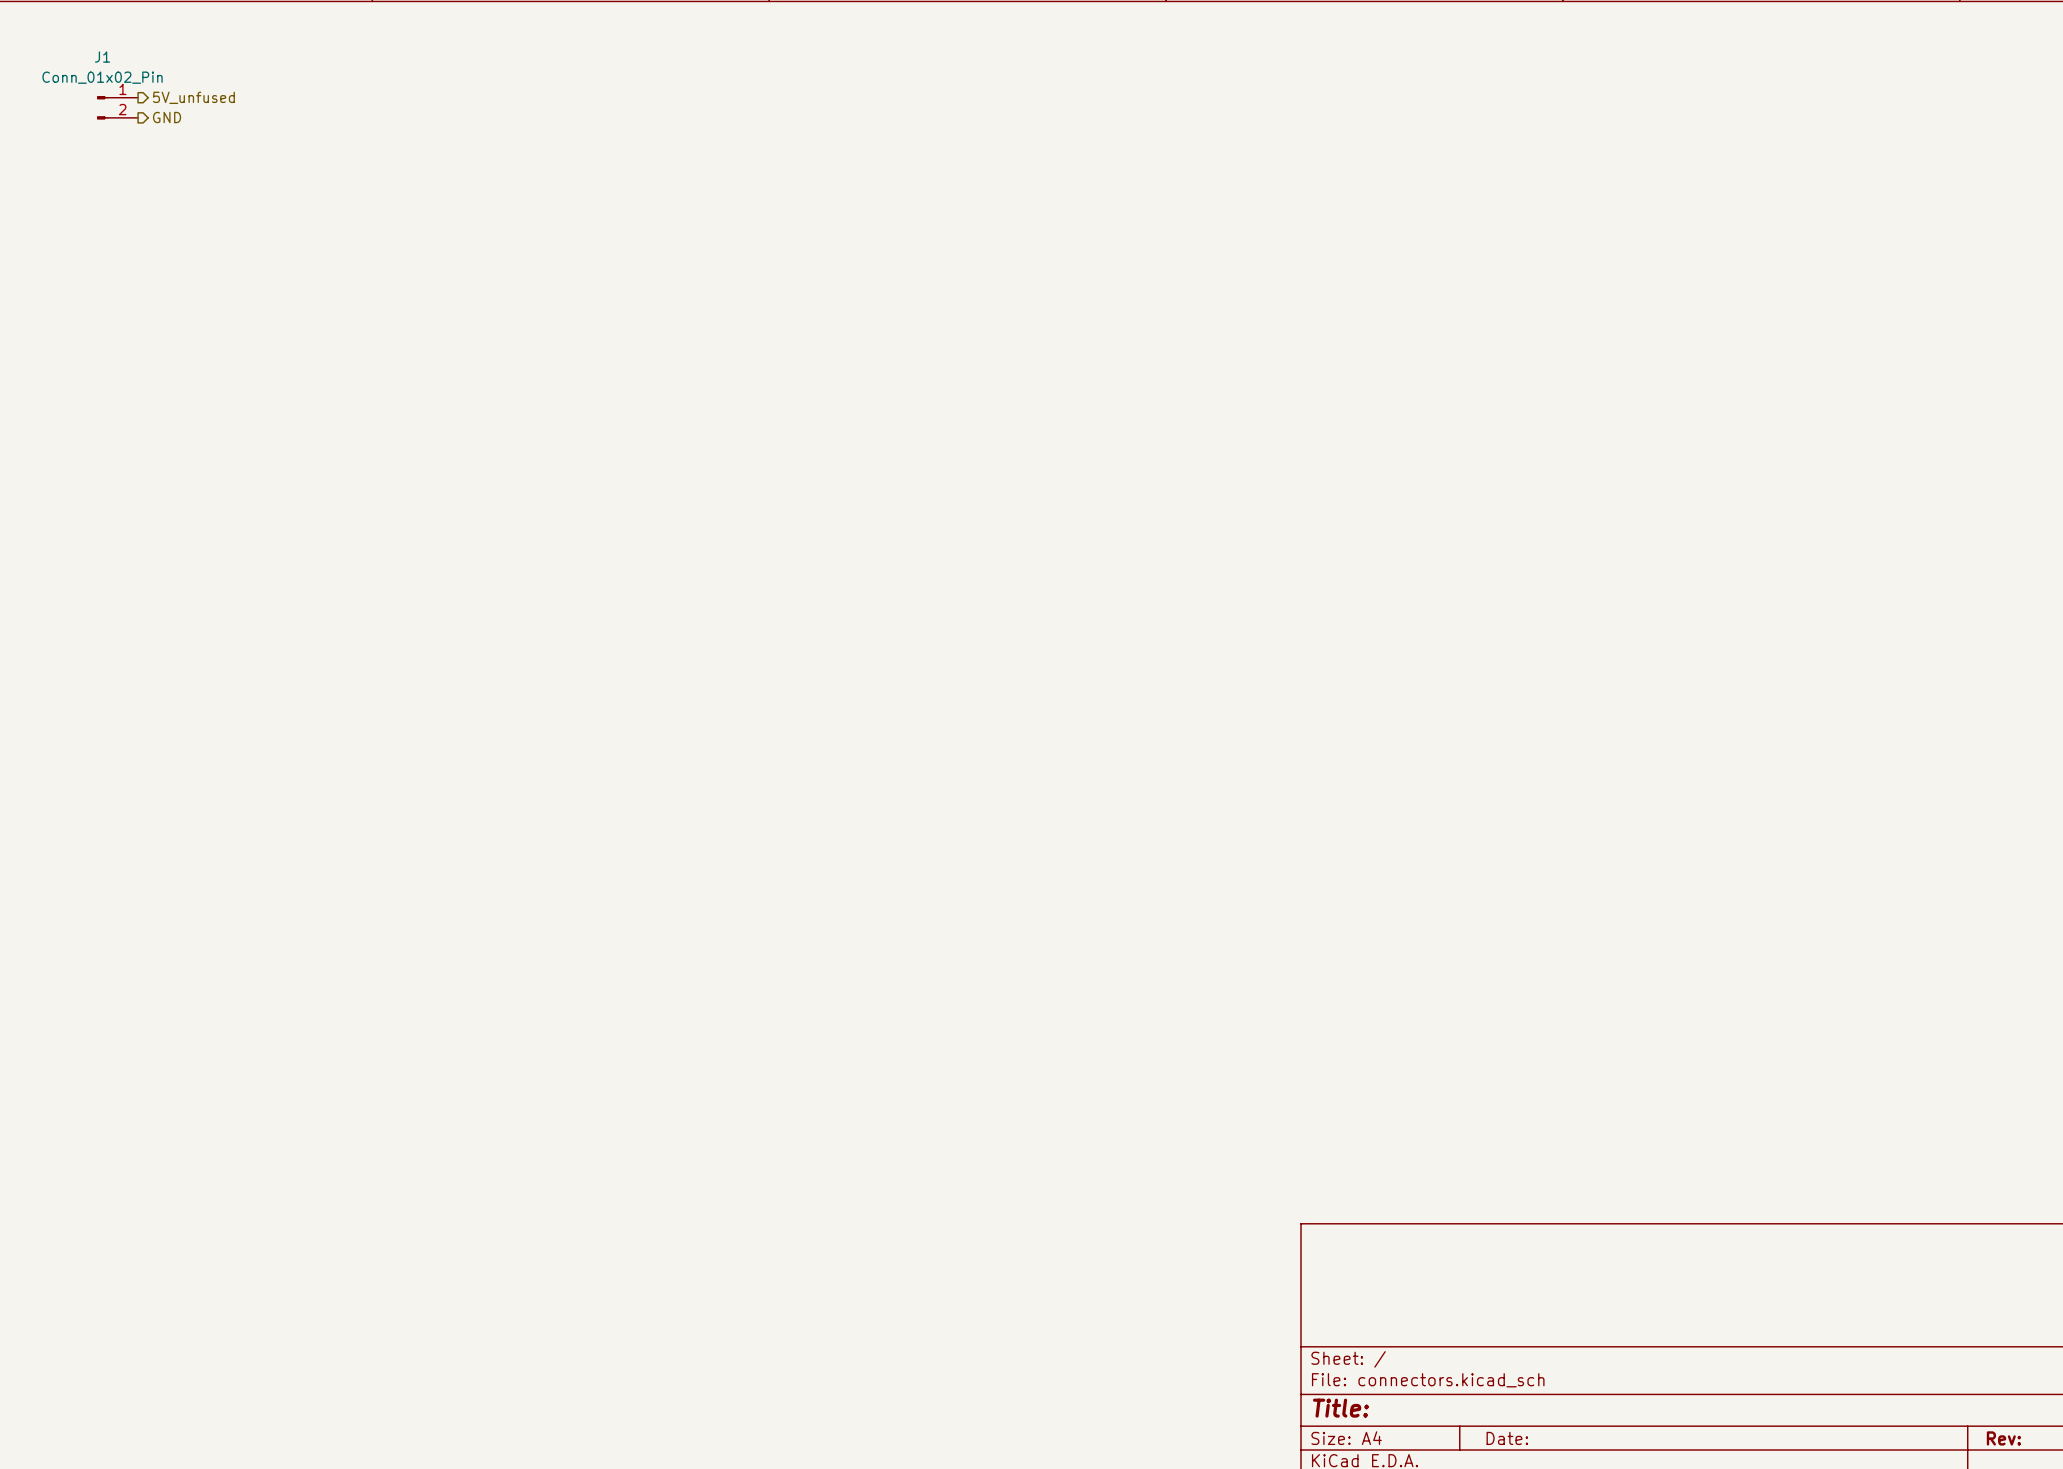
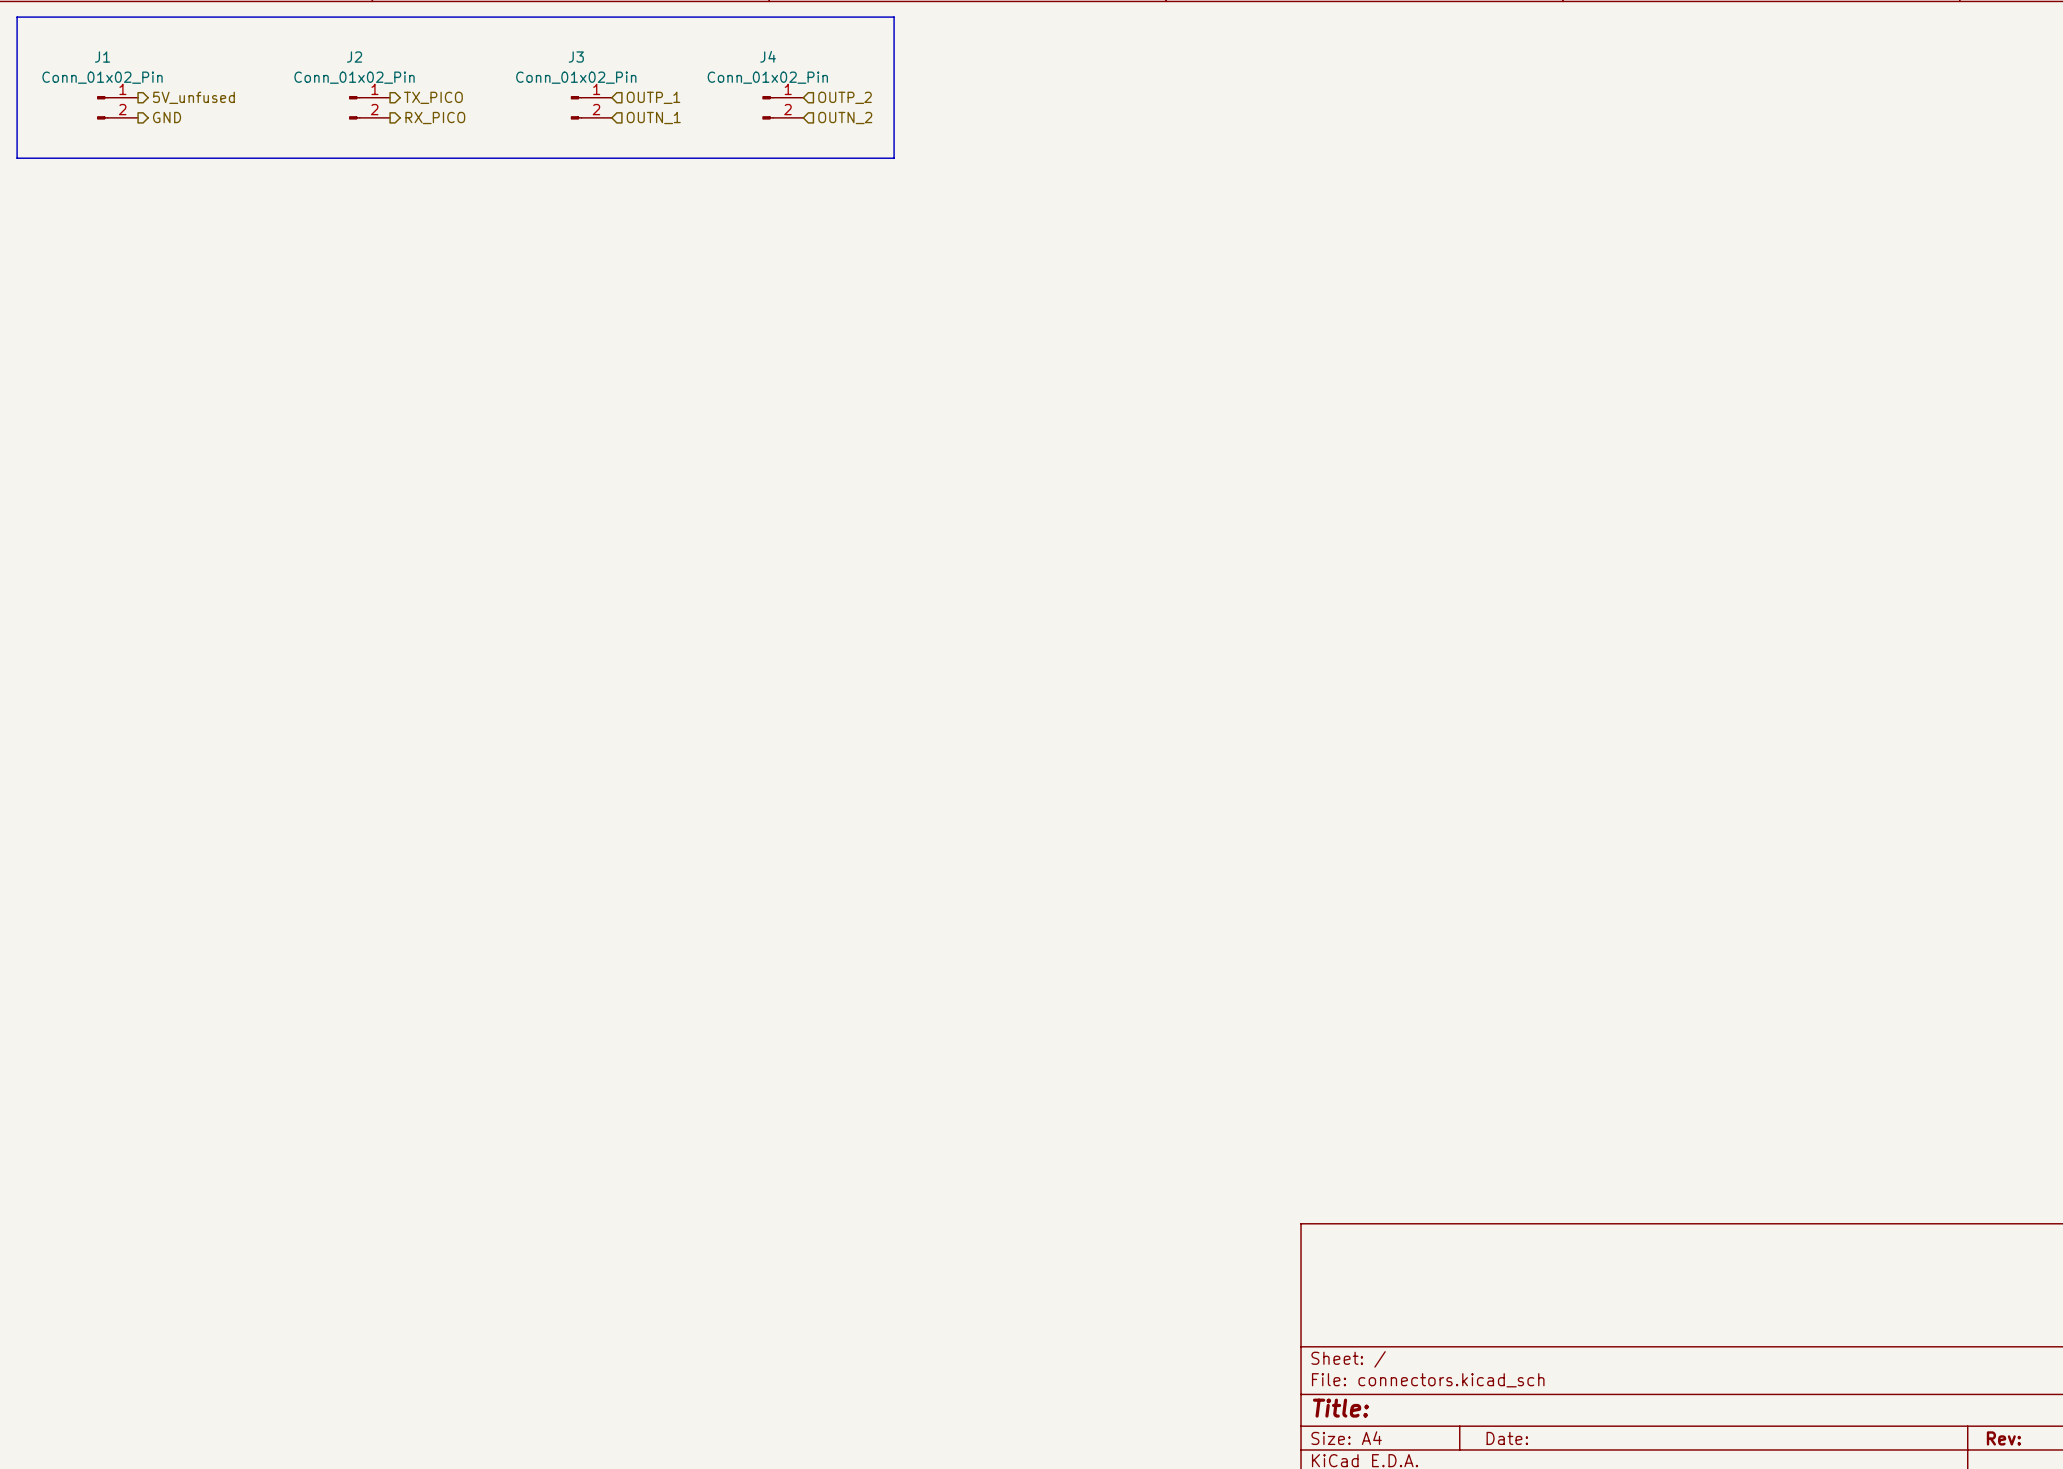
line: none -> (17, 17) (17, 158) (894, 158) (894, 17) (17, 17)
hierarchical label: none -> TX_PICO (433, 97)
hierarchical label: none -> OUTP_1 (653, 97)
hierarchical label: none -> OUTP_2 (845, 97)
J2: none -> Conn_01x02_Pin (369, 107)
J3: none -> Conn_01x02_Pin (591, 107)
J4: none -> Conn_01x02_Pin (782, 107)
hierarchical label: none -> RX_PICO (435, 117)
hierarchical label: none -> OUTN_1 (653, 117)
hierarchical label: none -> OUTN_2 (845, 117)

